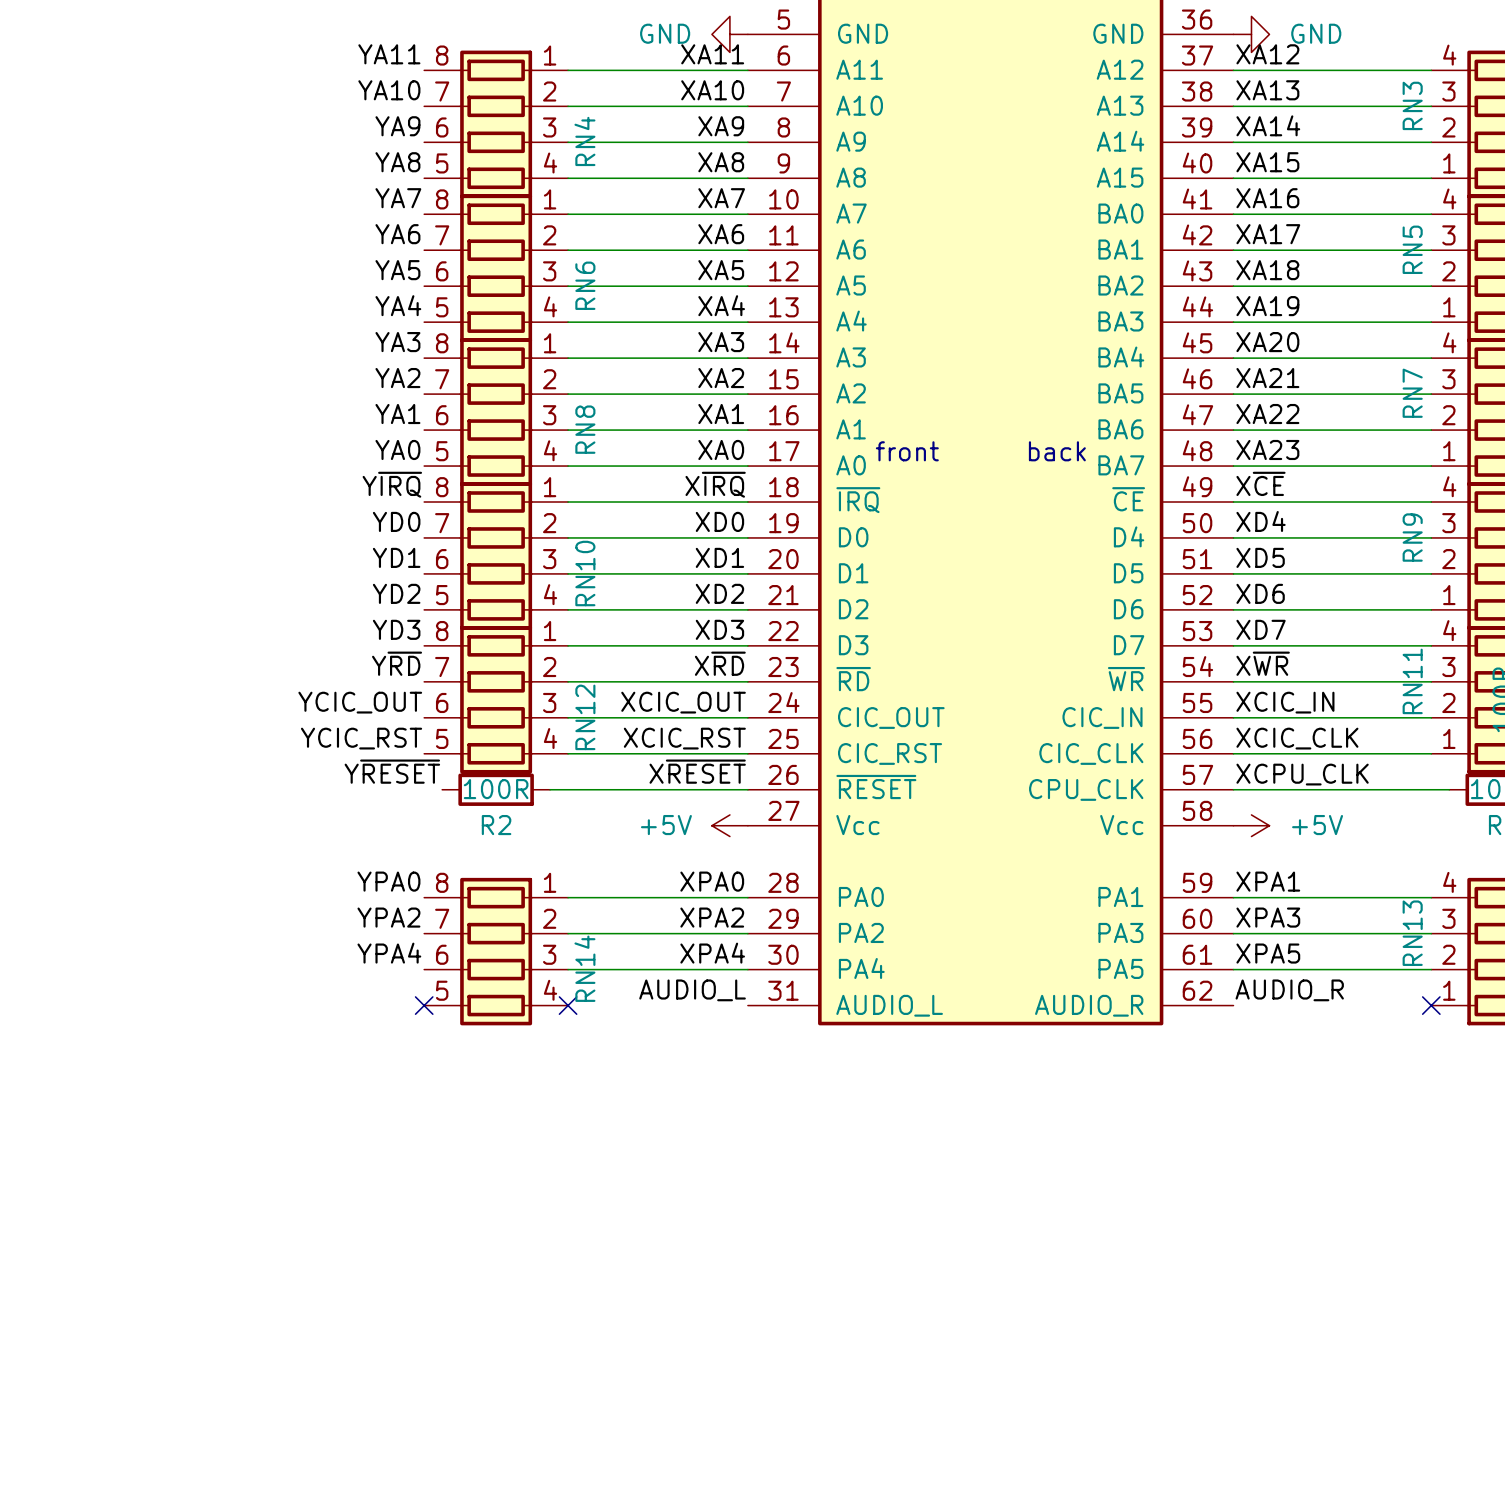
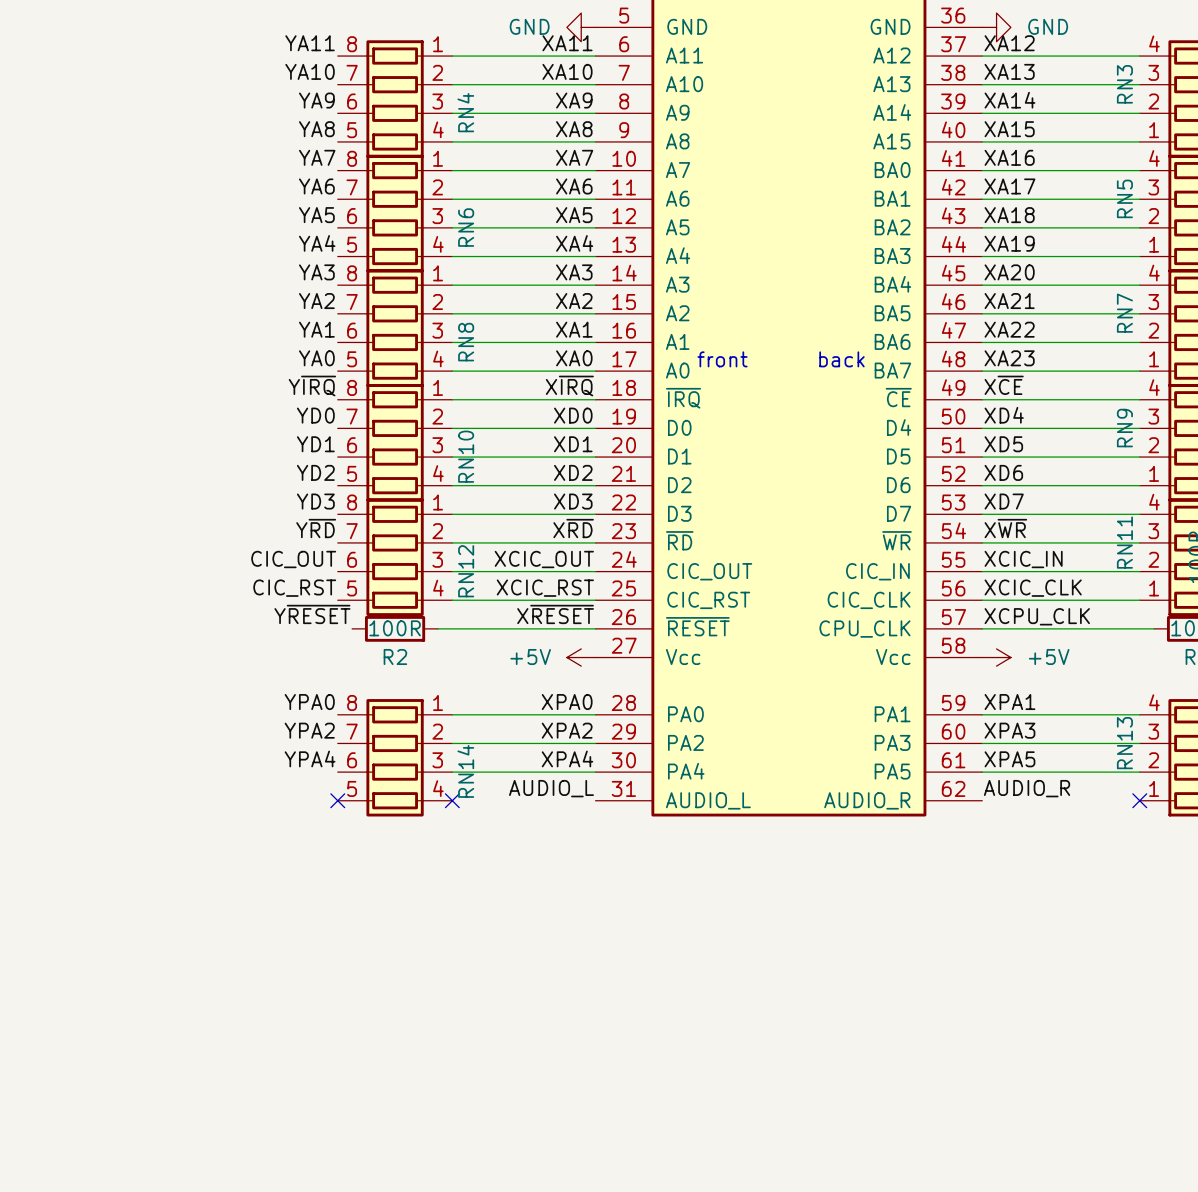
label: YCIC_OUT (360, 702) -> CIC_OUT (293, 559)
label: YCIC_RST (361, 738) -> CIC_RST (294, 588)

